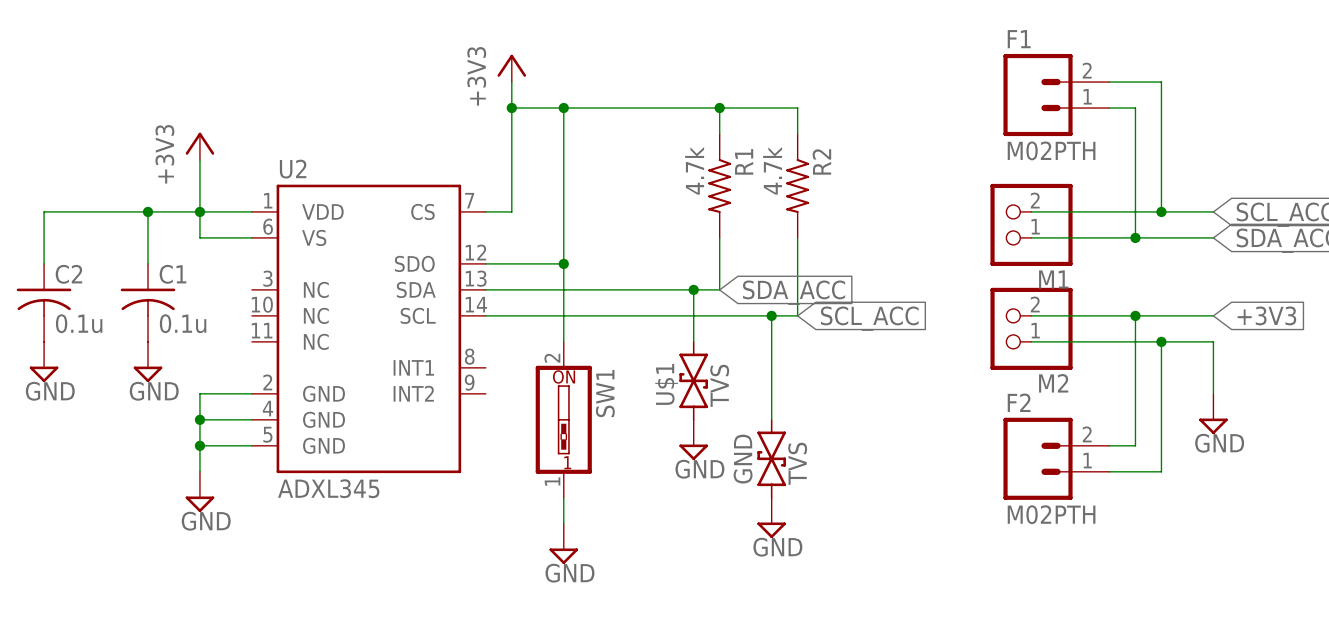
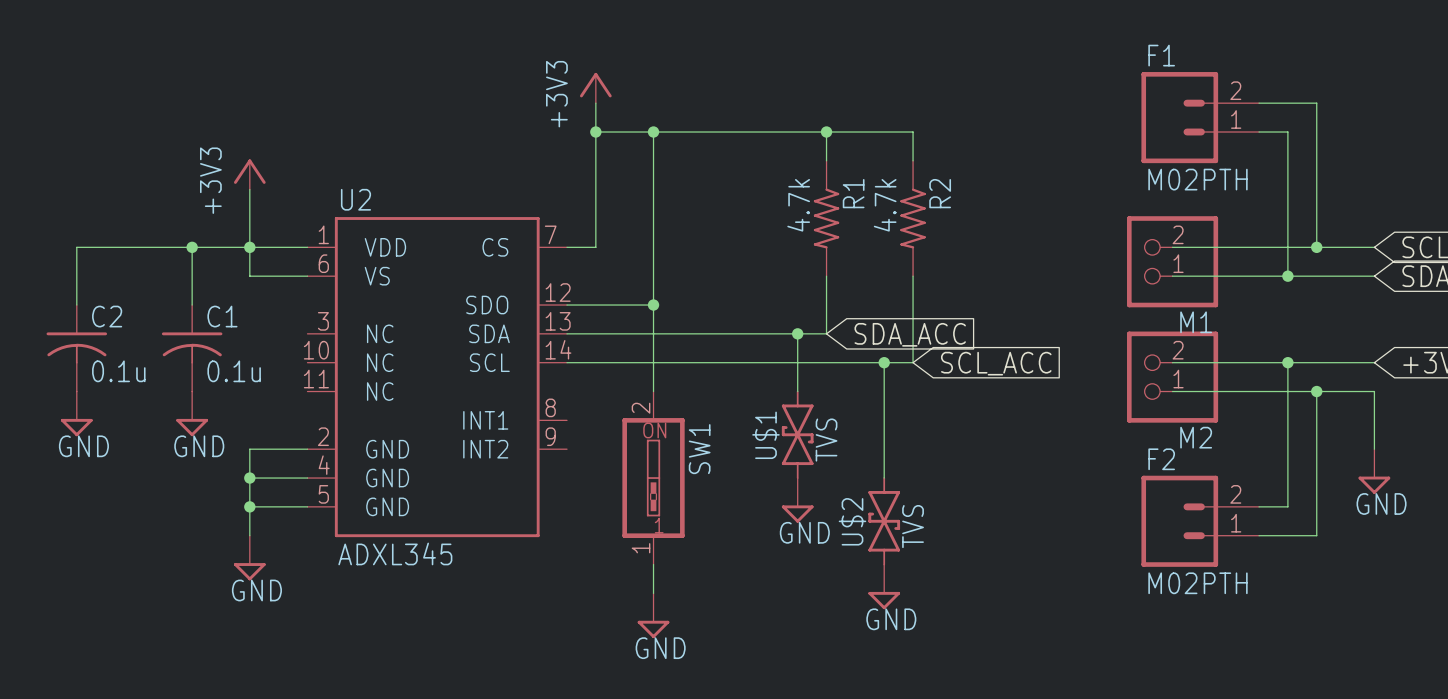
GND name: GND (743, 459) -> U$2 (852, 521)

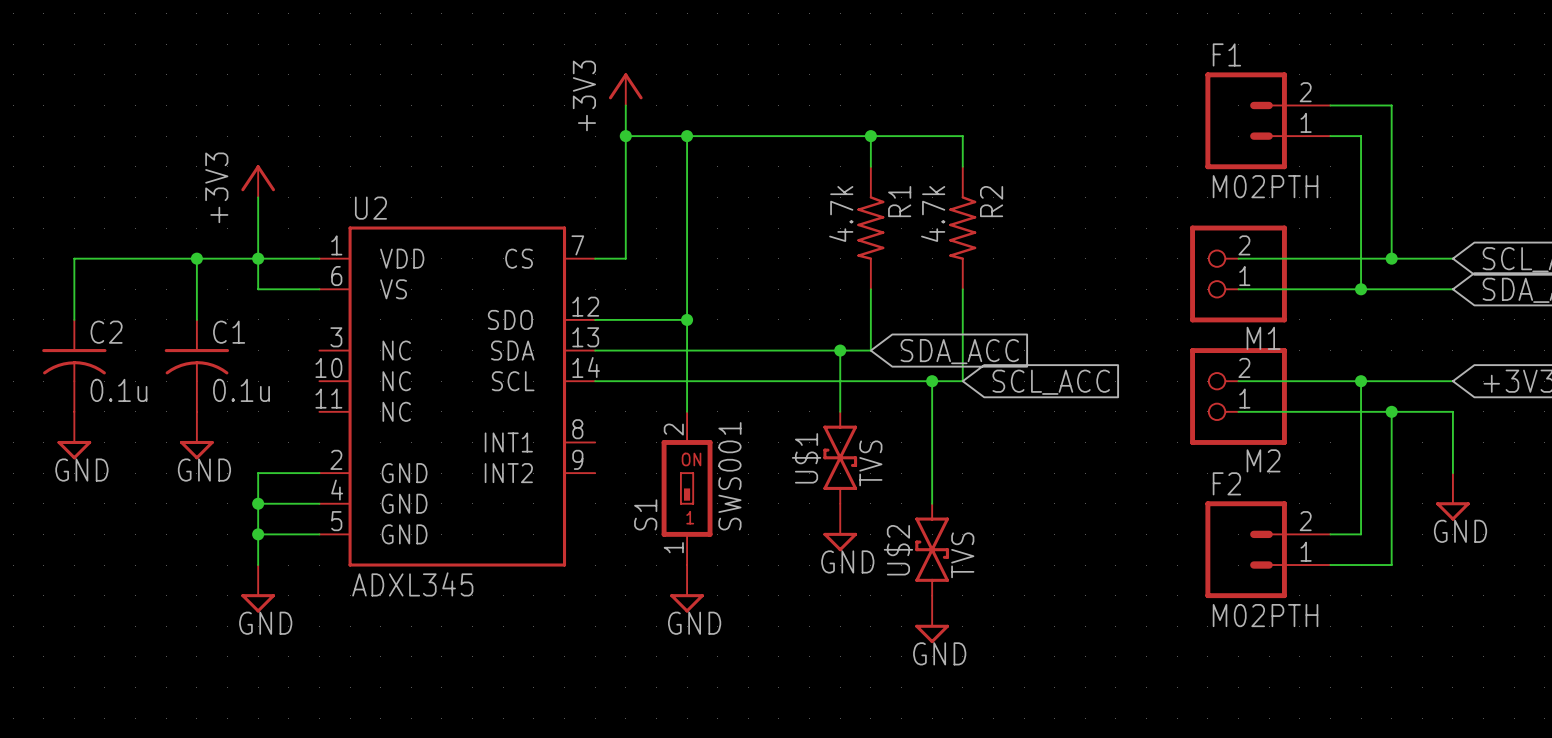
S1: none -> SWS001 (687, 488)
SW1: (653, 478) -> none
wire: (653, 564) (653, 593) -> none
power symbol position: GND (653, 615) -> GND (687, 588)

